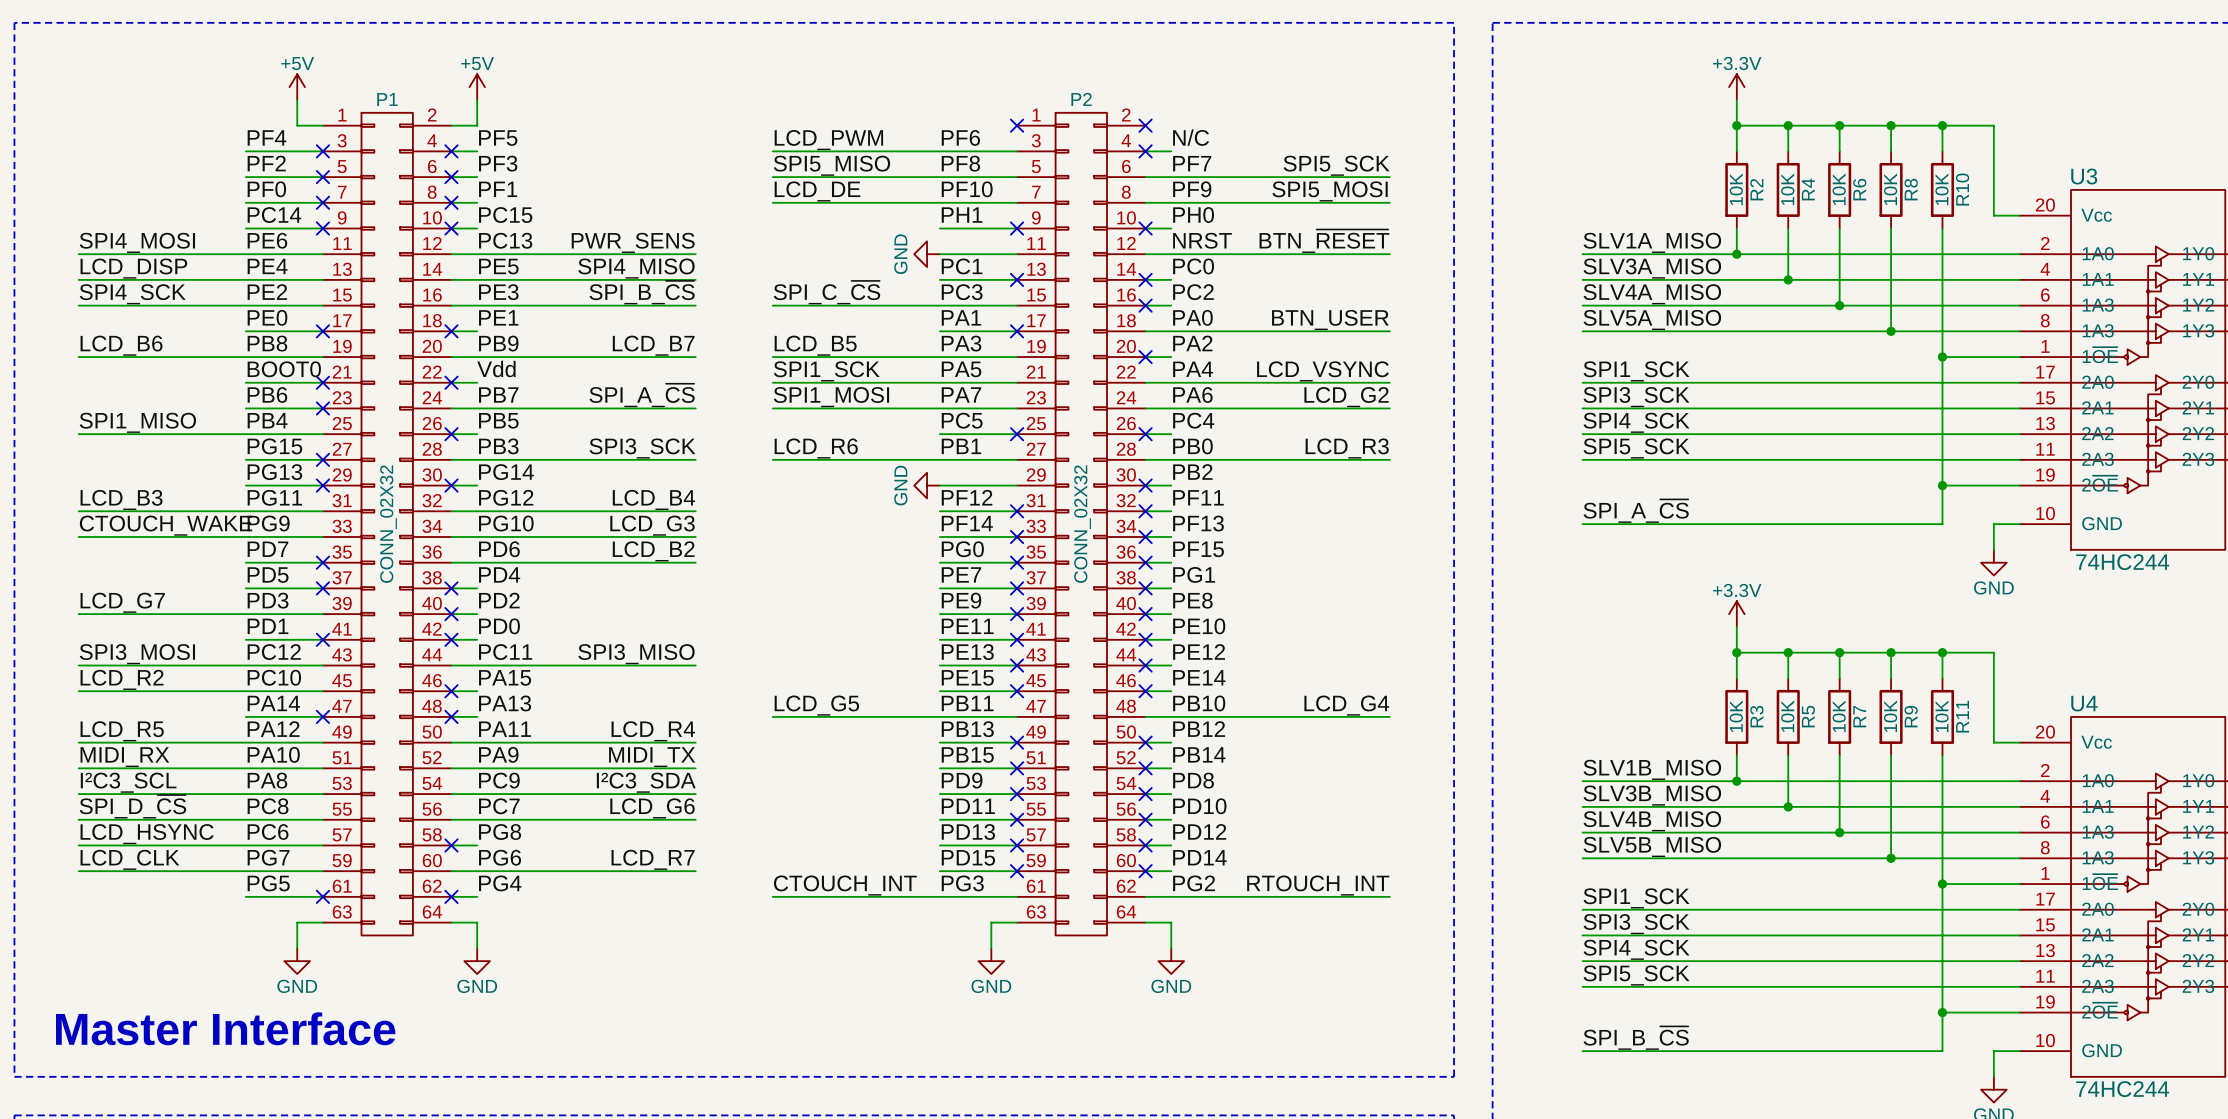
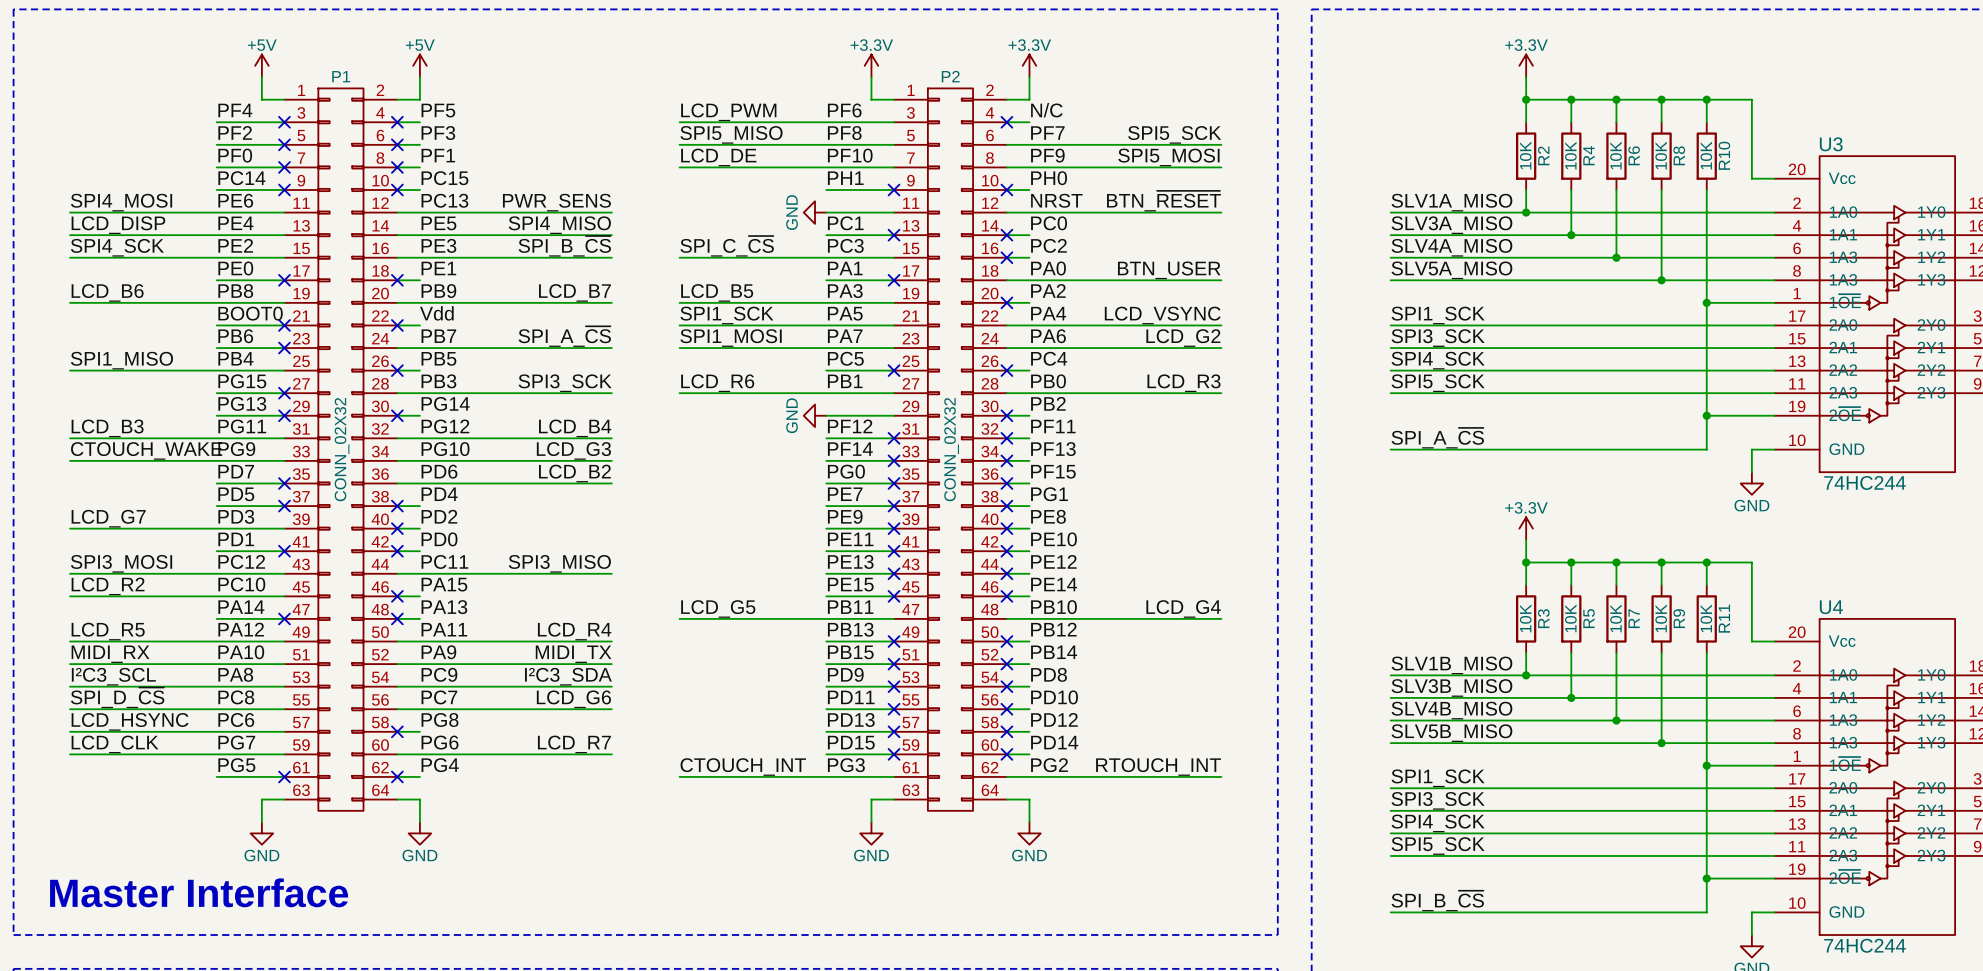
power symbol: none -> +3.3V (871, 65)
power symbol: none -> +3.3V (1029, 65)
wire: none -> (871, 77) (871, 99) (894, 99)
wire: none -> (1029, 77) (1029, 99) (1006, 99)
no-connect mark: (1017, 125) -> none
no-connect mark: (1145, 125) -> none

